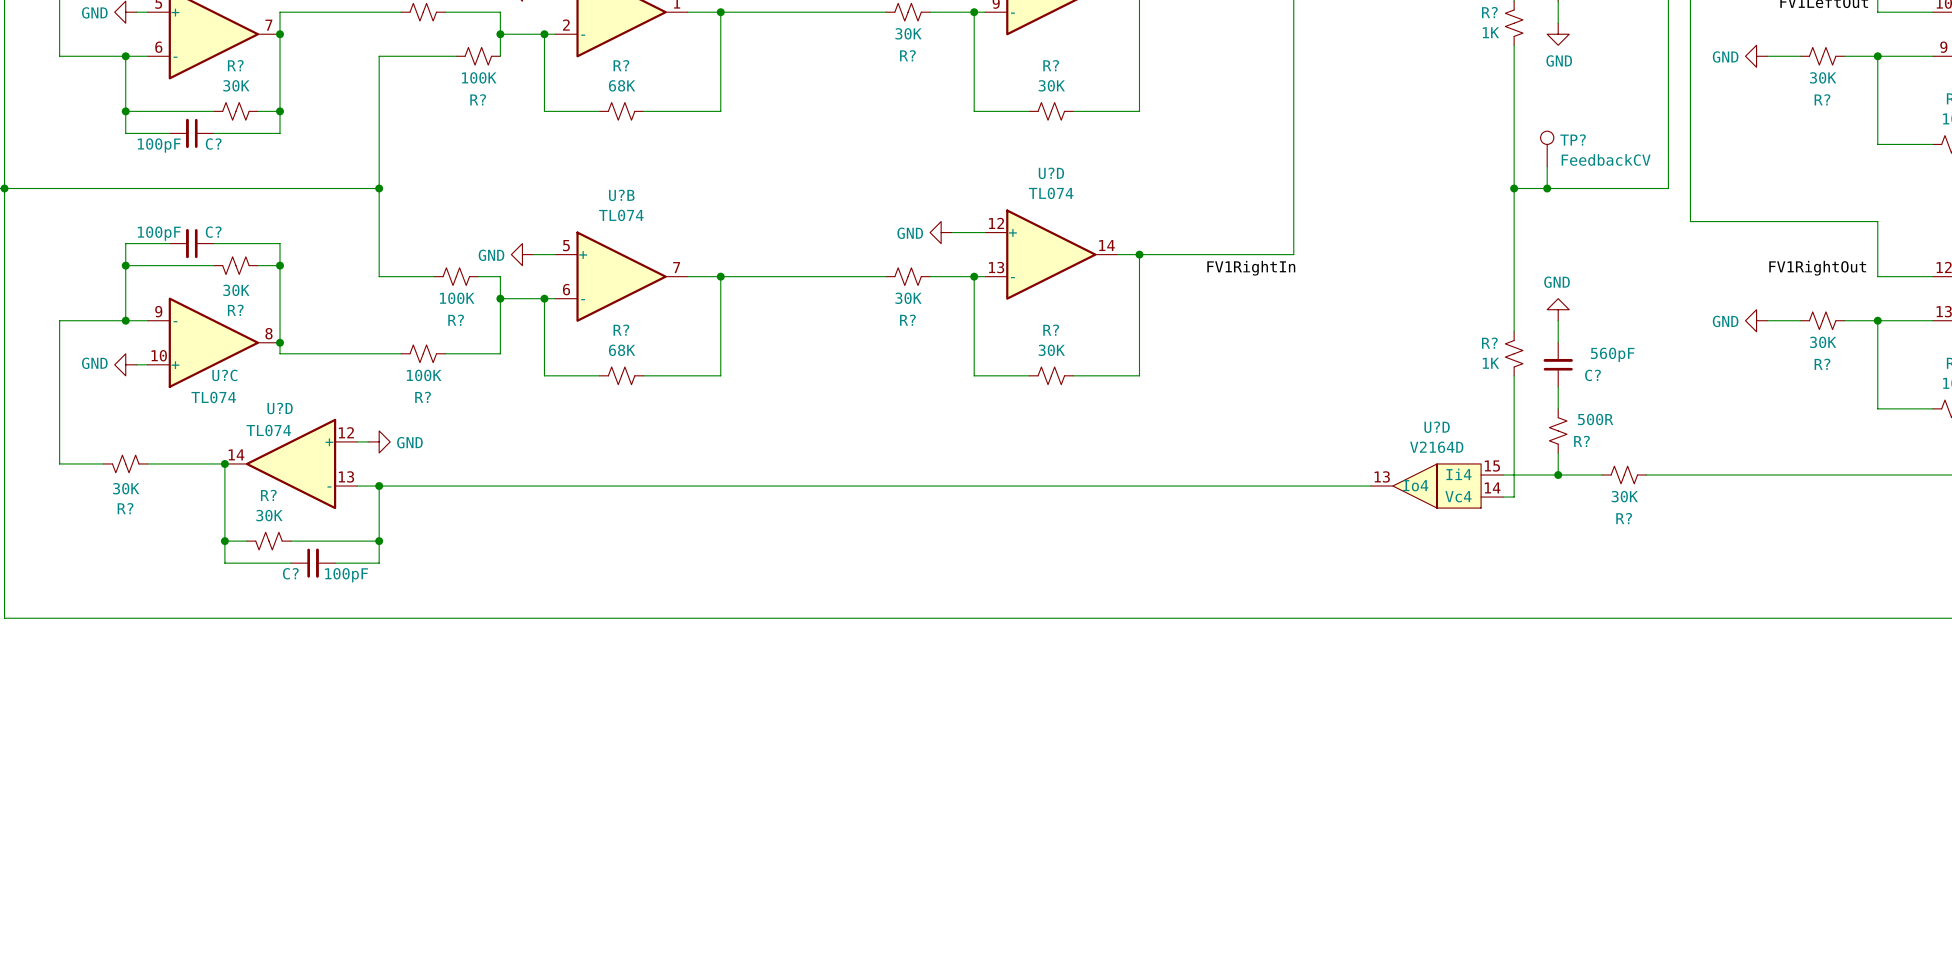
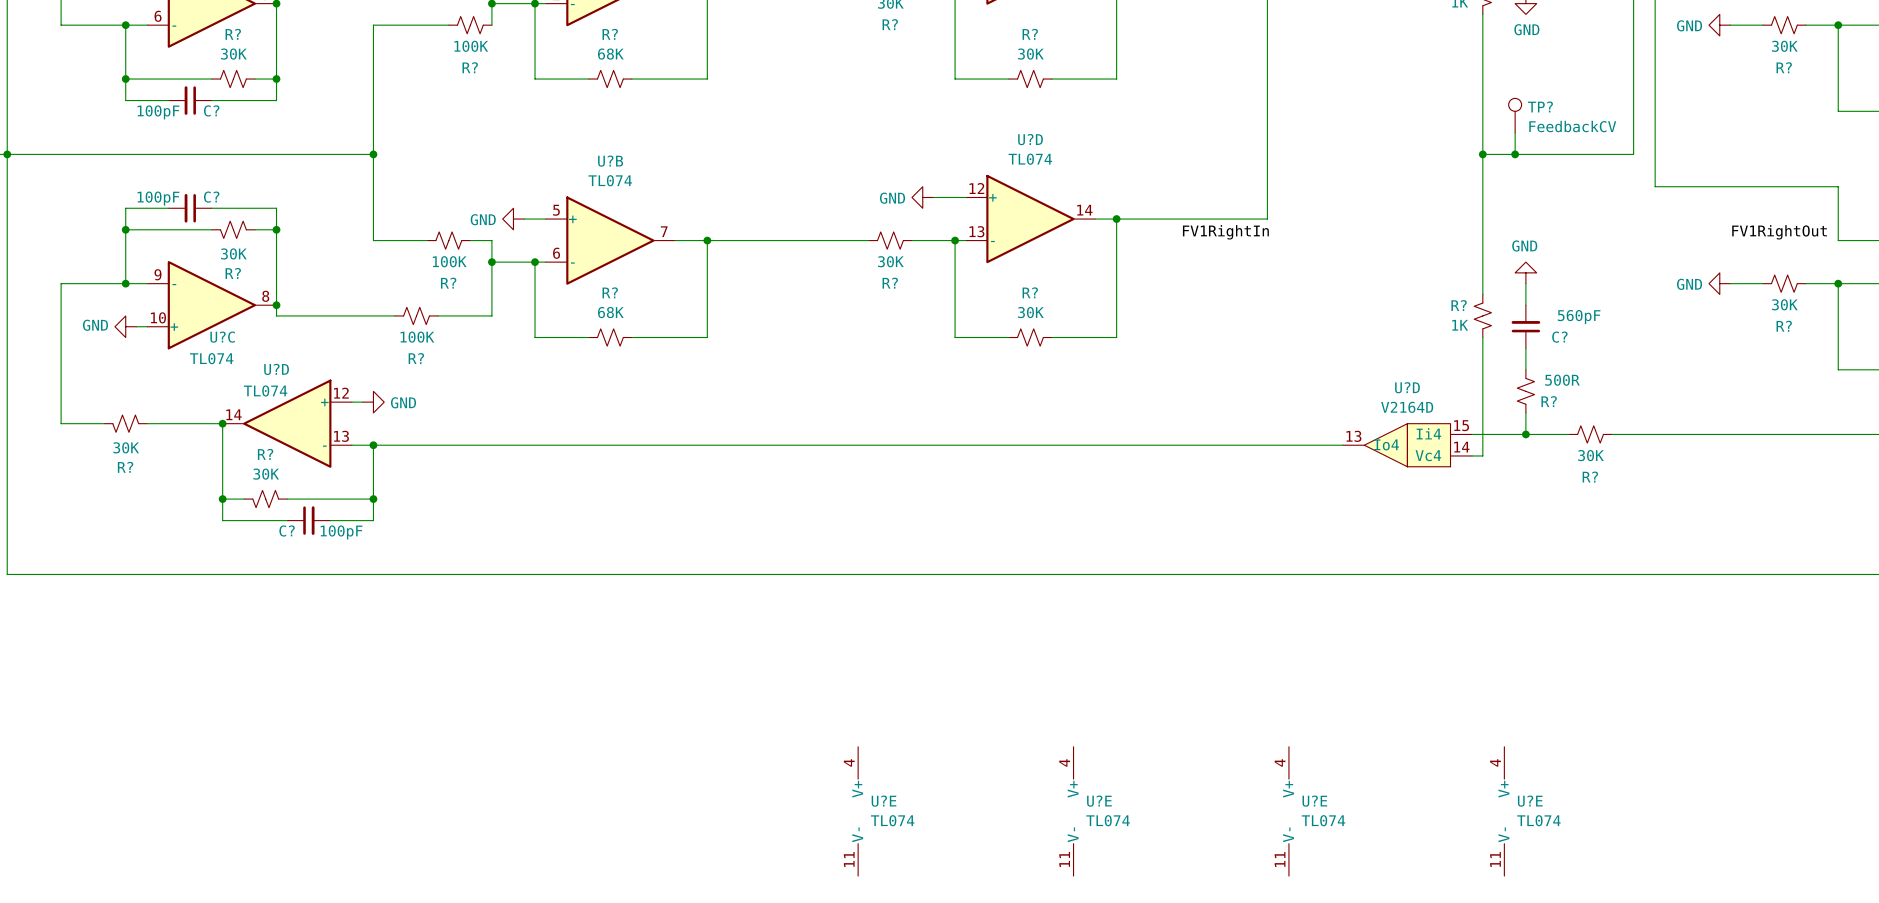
U?E: none -> TL074 (858, 811)
U?E: none -> TL074 (1073, 811)
U?E: none -> TL074 (1288, 811)
U?E: none -> TL074 (1504, 811)

